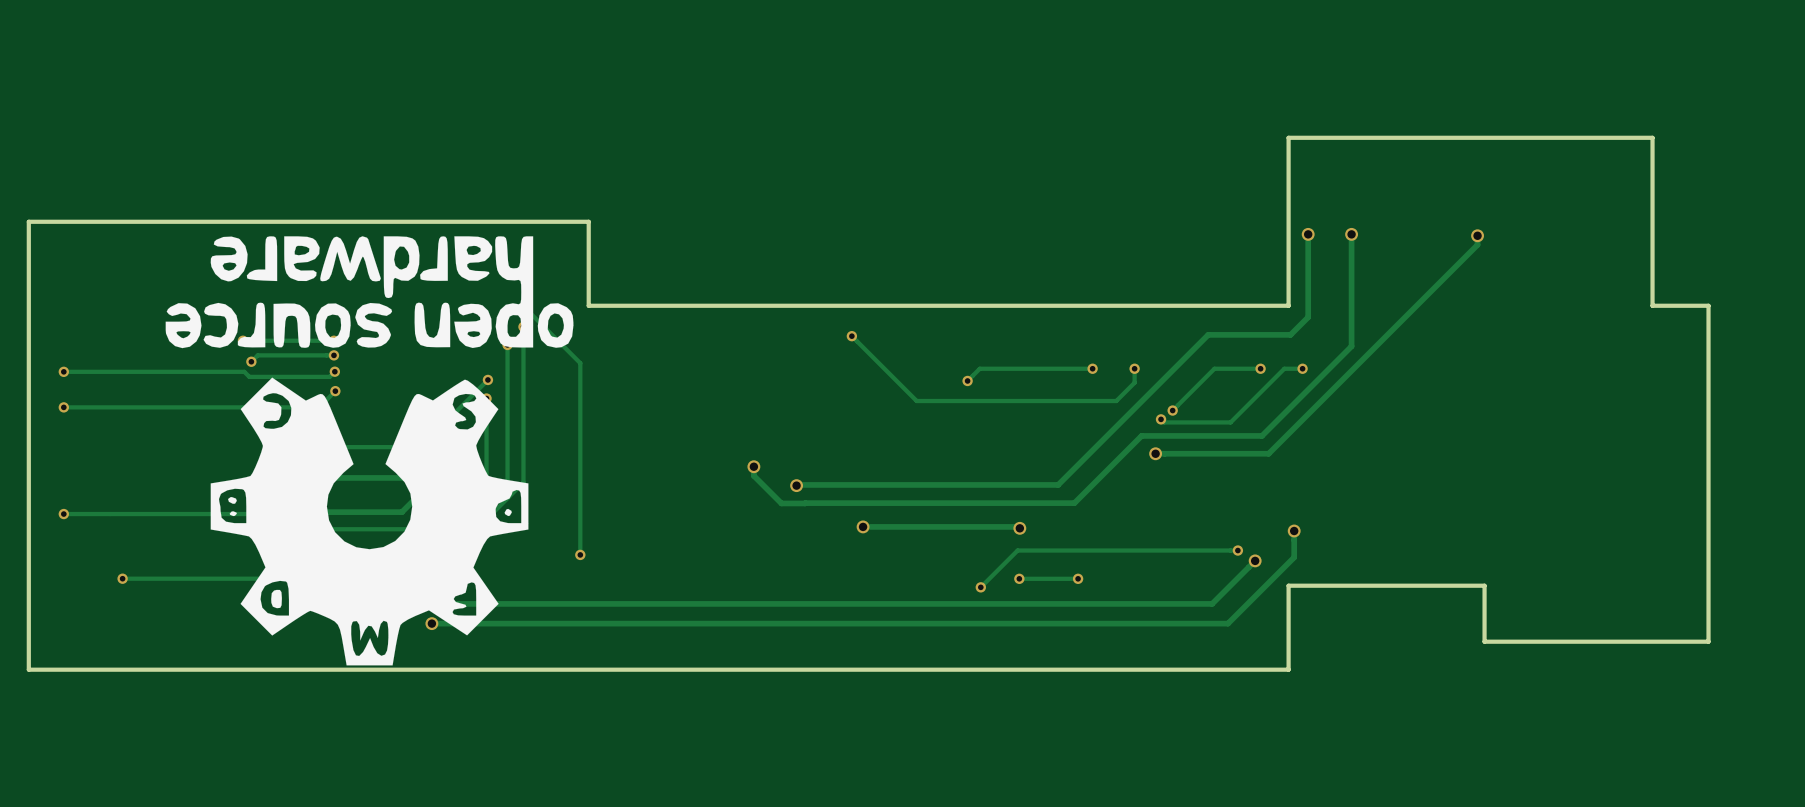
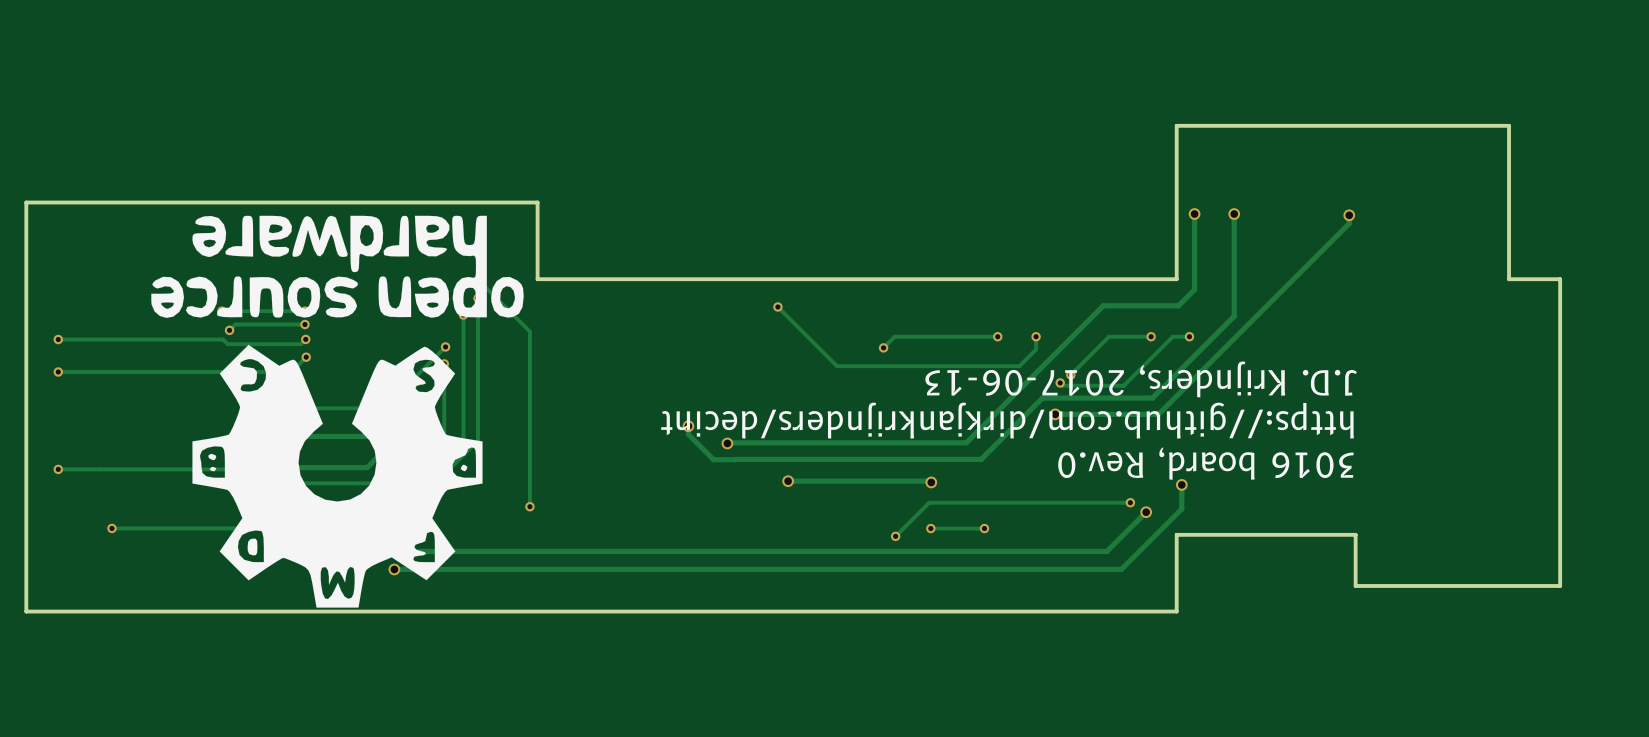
text: none -> J.D. Krijnders, 2017-06-13 (1141, 379)
text: none -> https://github.com/dirkjankrijnders/decint (1007, 420)
text: none -> 3016 board, Rev.0 (1205, 463)

